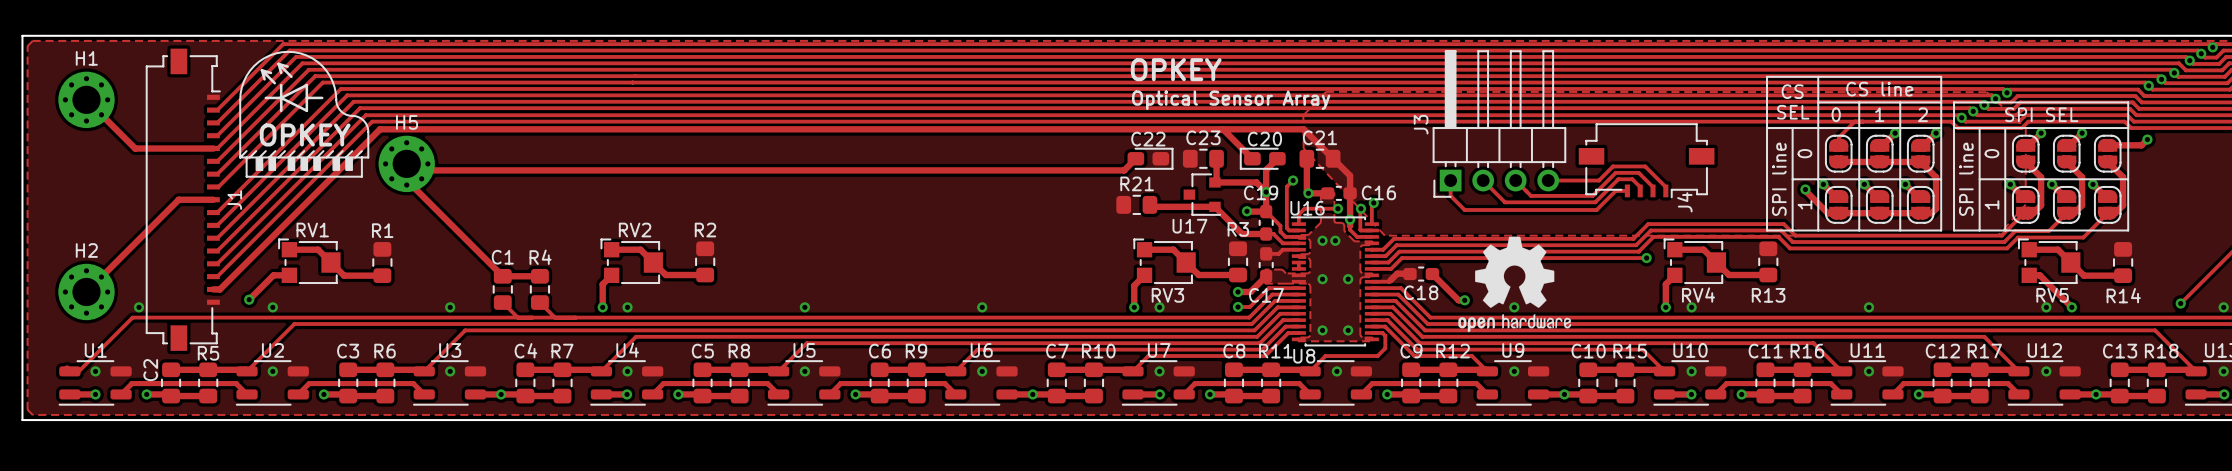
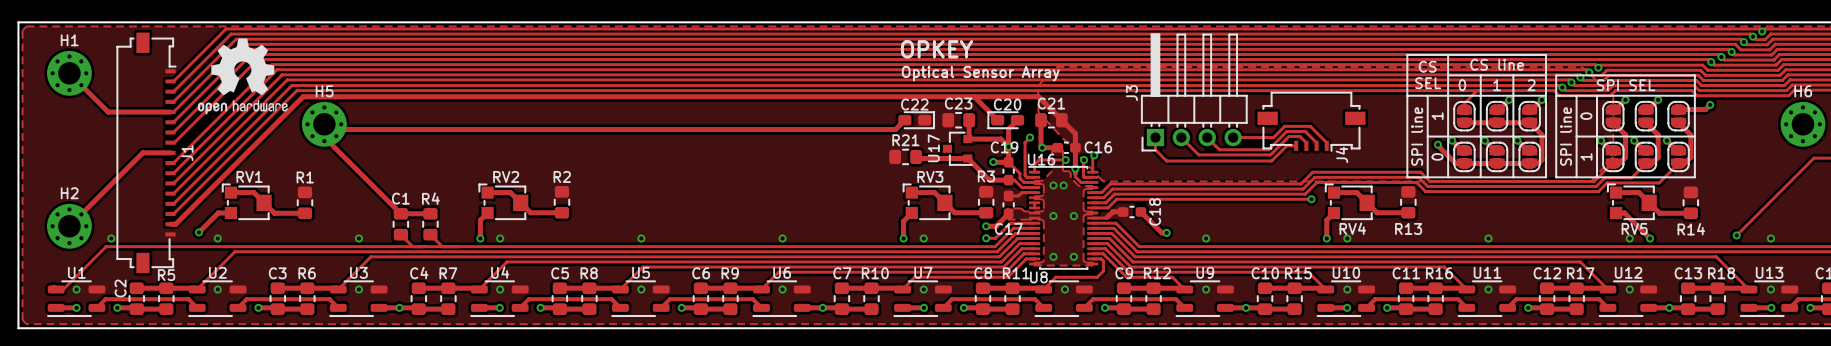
drawing shape: [239, 51, 370, 178] -> [197, 38, 288, 115]
text: 0 (1804, 153) -> 1 (1437, 116)
text: 1 (1804, 204) -> 0 (1437, 156)
U17 name rotation: 0° (1189, 226) -> 90° counterclockwise (933, 148)
drawing: [1458, 236, 1572, 333] -> none
C18 name rotation: 0° (1421, 292) -> 90° counterclockwise (1155, 212)
RV3 name position: RV3 (1167, 295) -> RV3 (930, 176)

